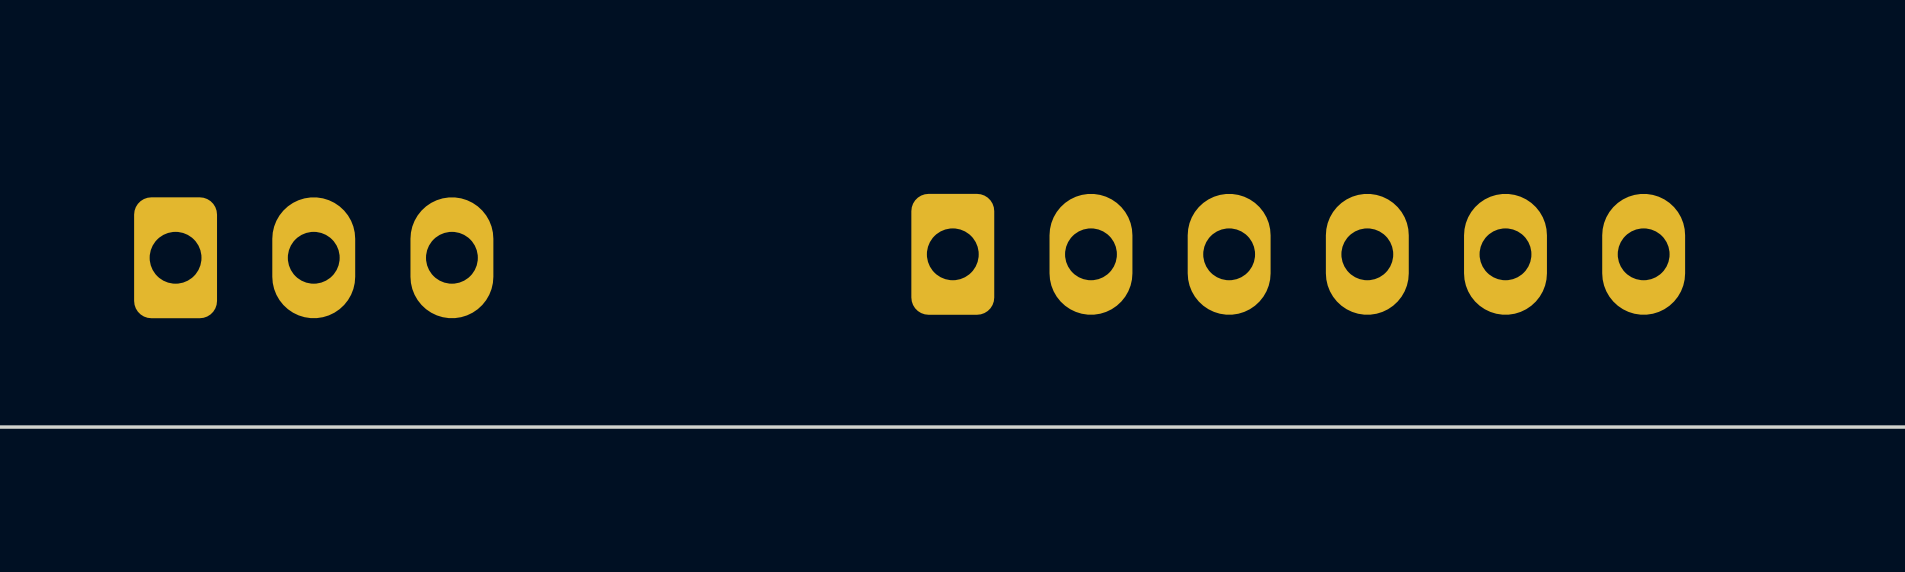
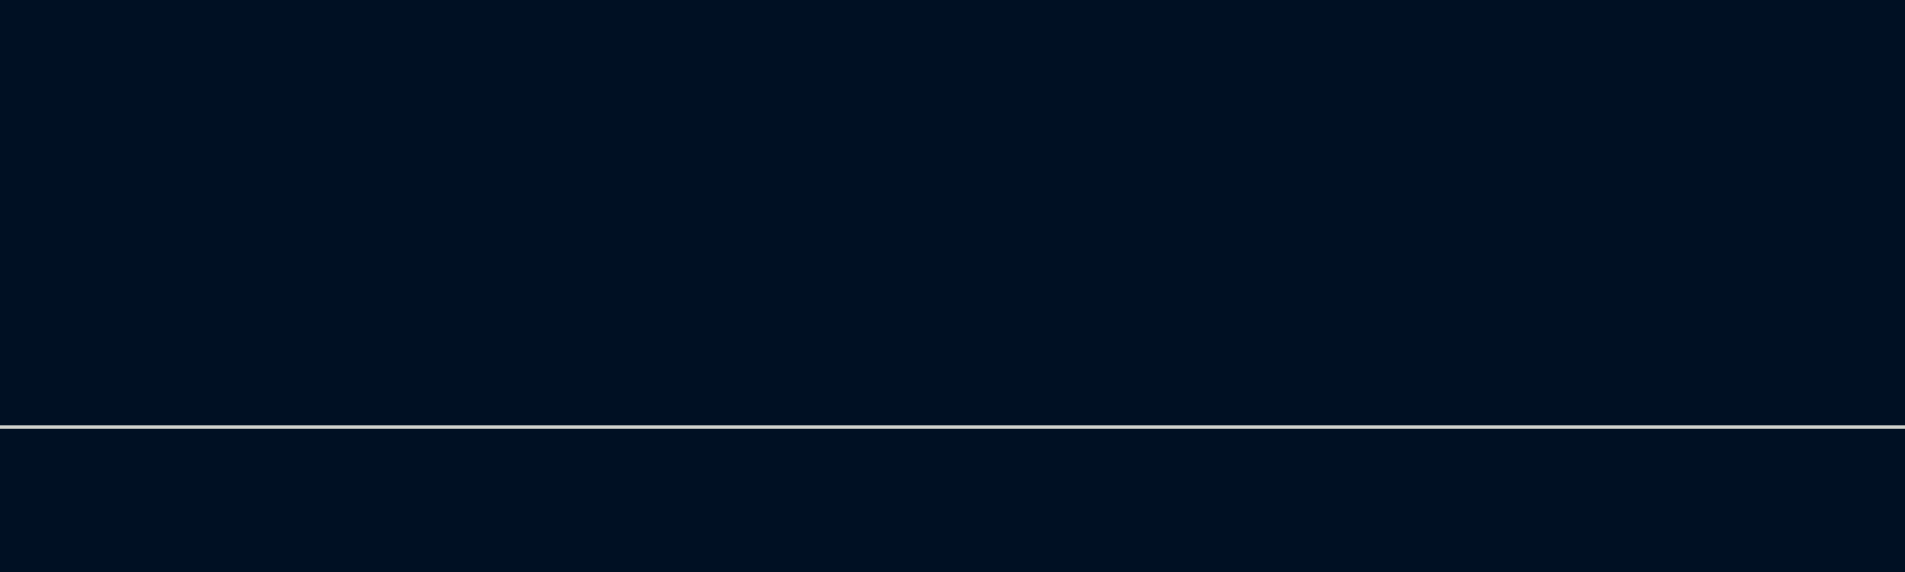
part: (1298, 254) -> none
part: (313, 257) -> none

